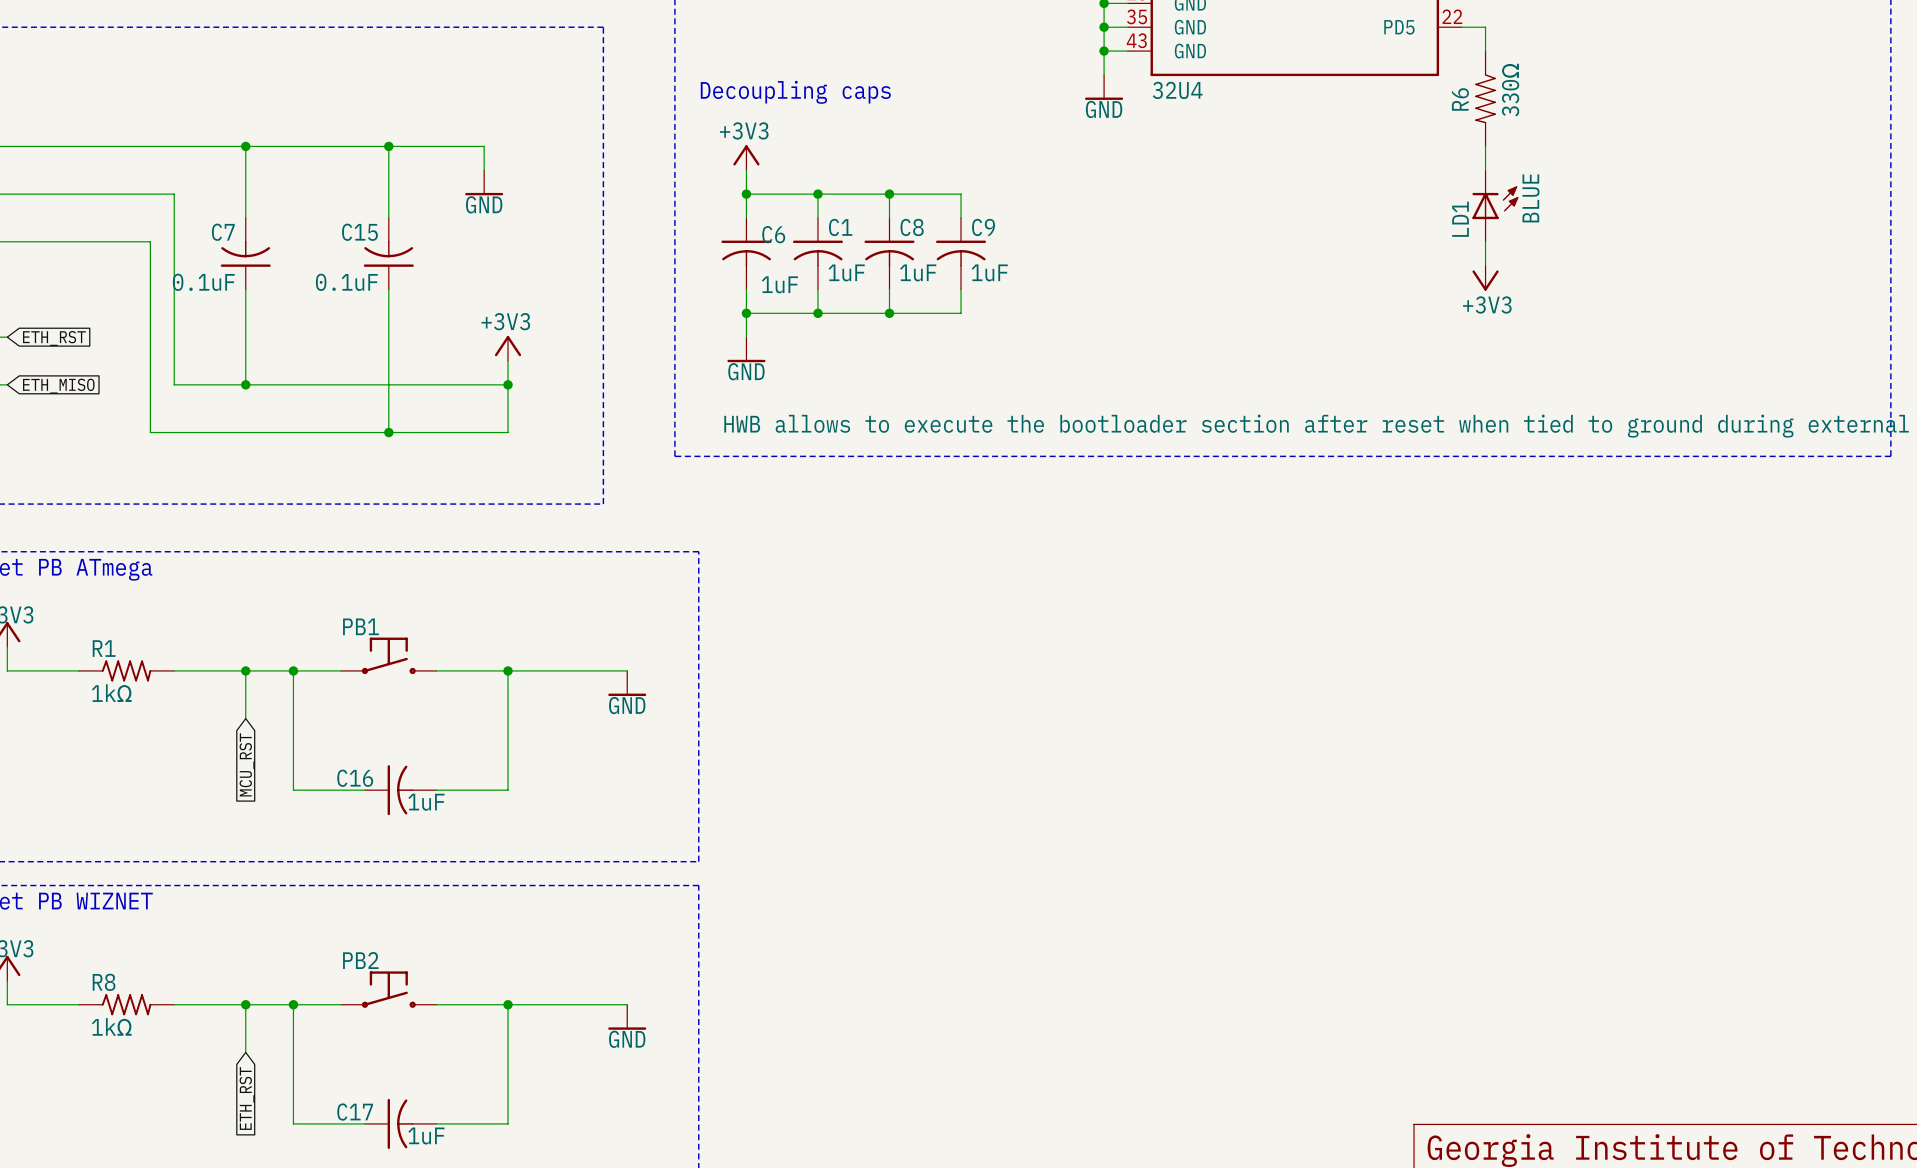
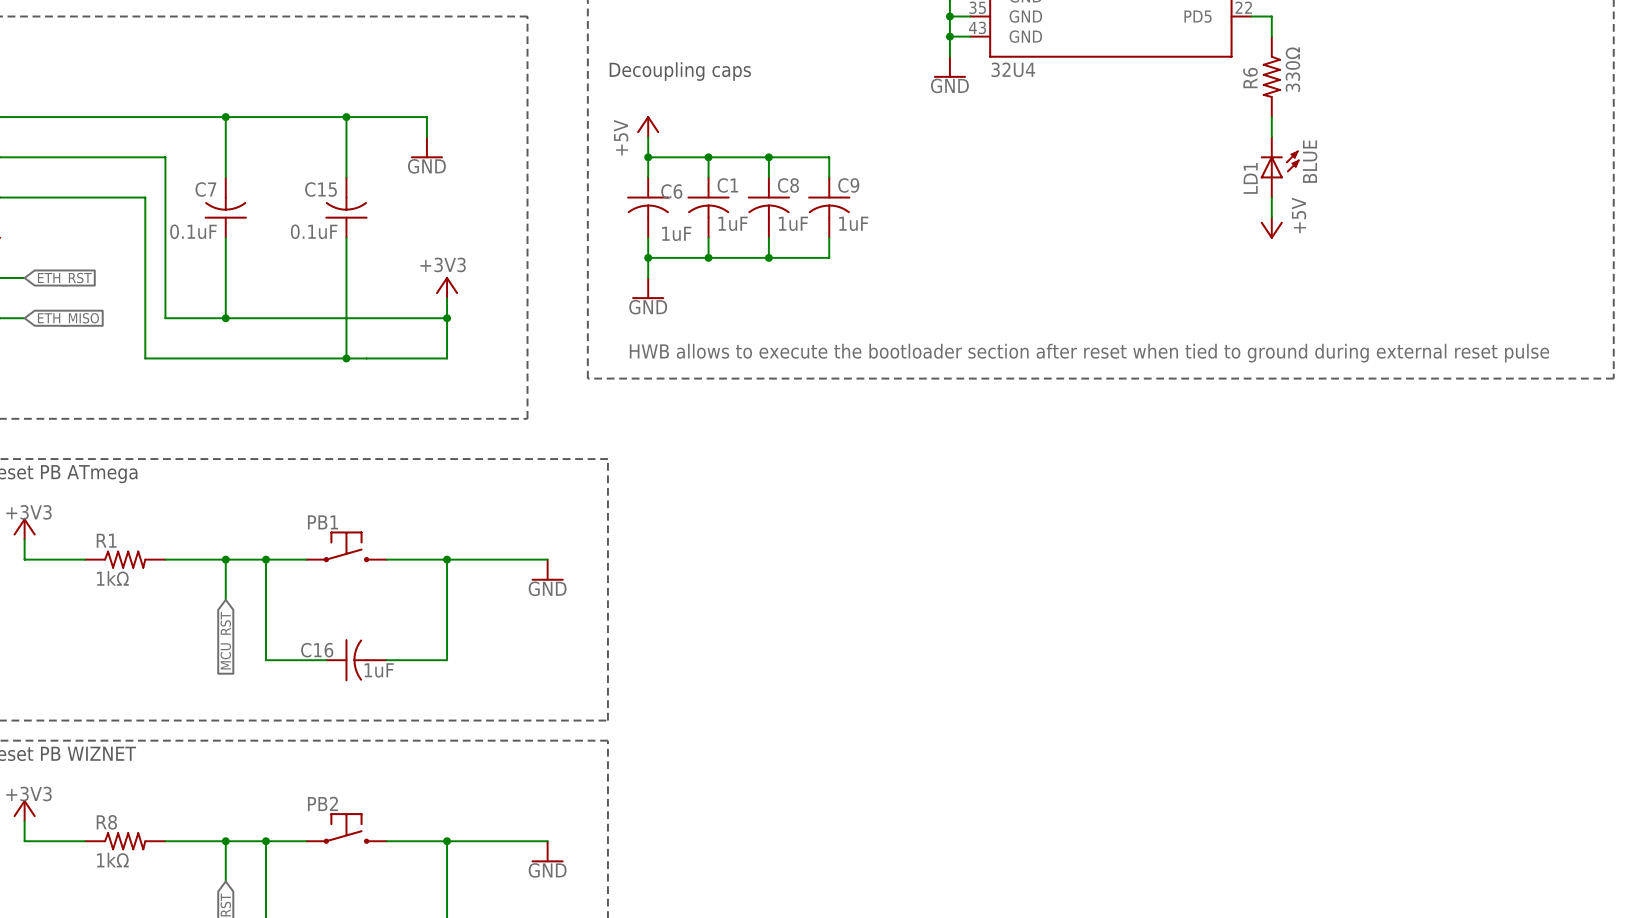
power symbol: +3V3 (746, 157) -> +5V (648, 126)
power symbol: +3V3 (1485, 278) -> +5V (1271, 228)

